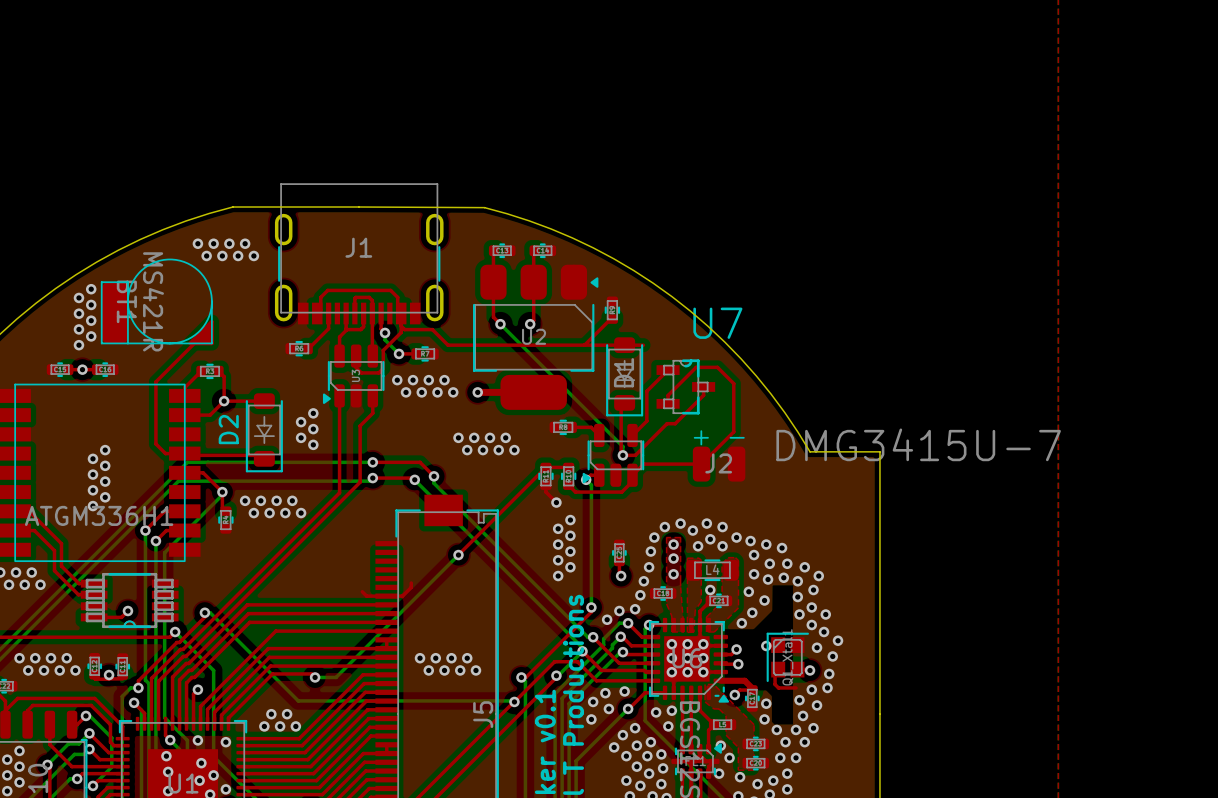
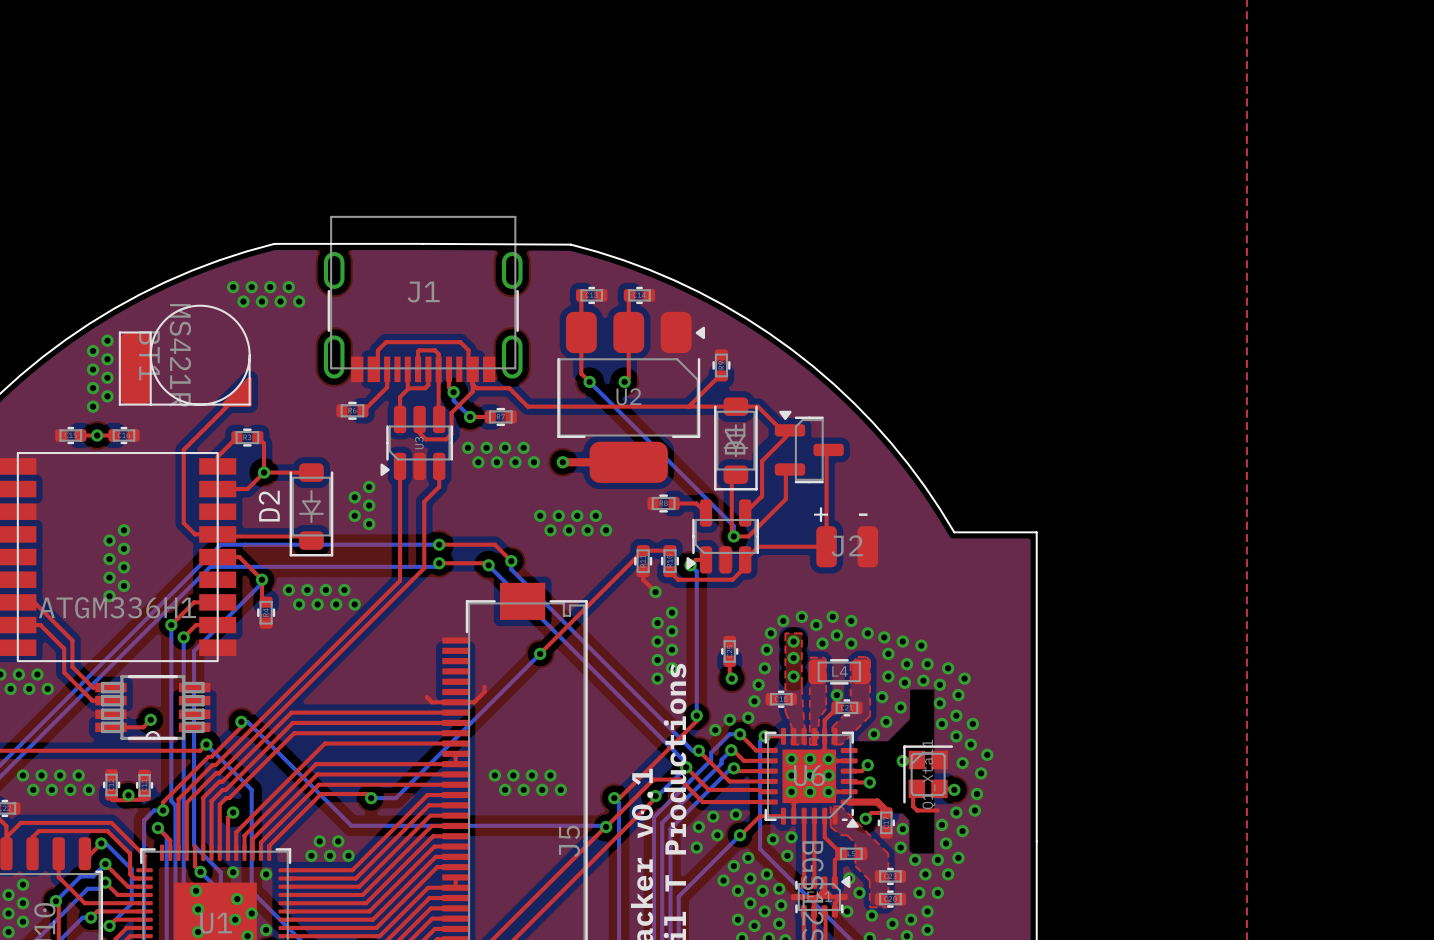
top track: none -> (758, 406) (781, 430)
part: none -> (809, 447)
U7: DMG3415U-7 (685, 386) -> none
top track: (703, 386) (703, 395) (675, 423) (667, 423) -> (785, 469) (785, 499)
top track: (668, 403) (668, 395) (696, 367) (717, 367) (733, 383) (733, 431) (701, 464) -> (824, 449) (826, 454) (826, 546)

